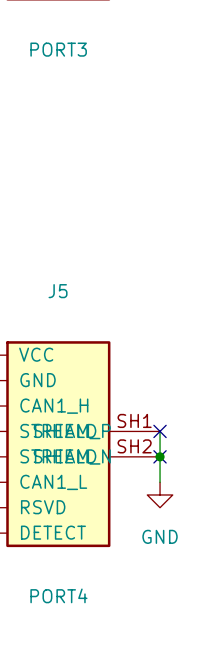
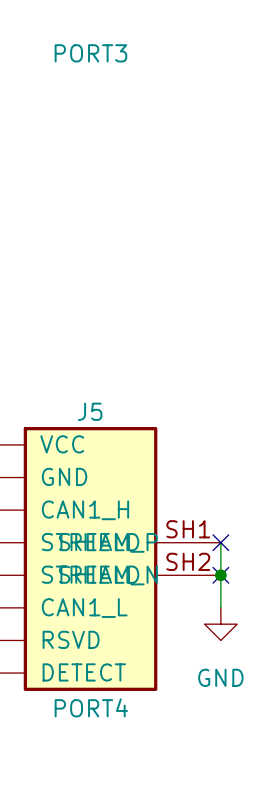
J5 name position: J5 (58, 291) -> J5 (90, 411)
J5 value position: PORT4 (58, 595) -> PORT4 (91, 707)

